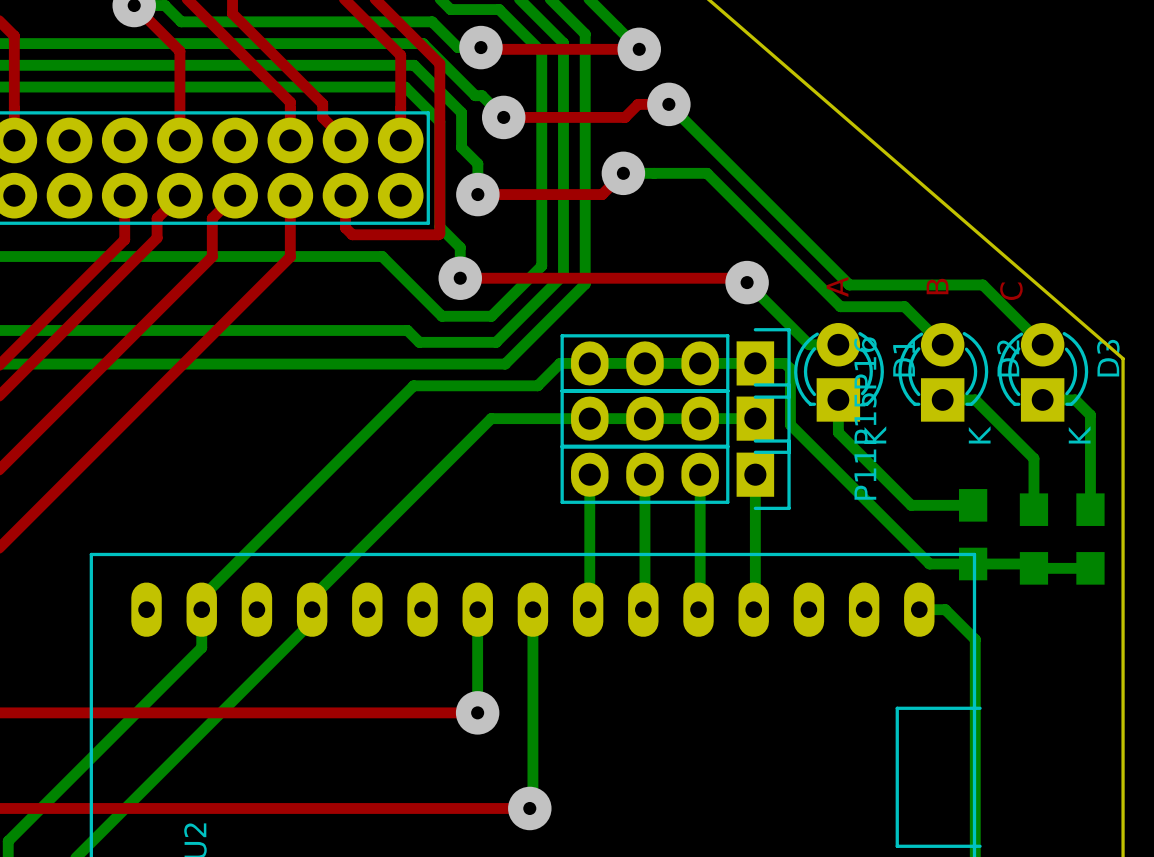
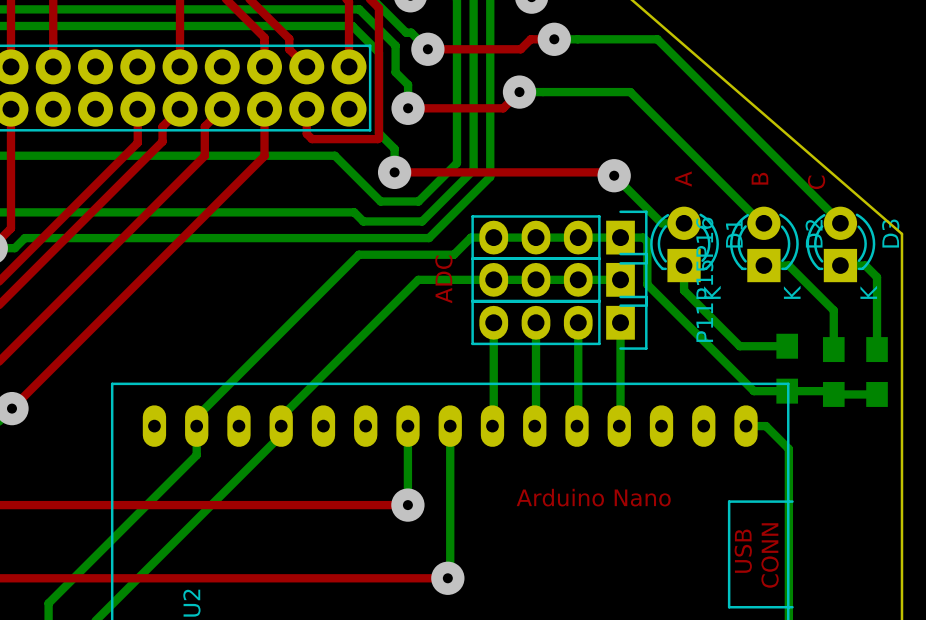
bottom track: (668, 104) (849, 284) (982, 284) (1042, 344) -> (554, 39) (657, 39) (840, 223)
bottom track: (707, 173) (840, 306) (904, 306) (942, 344) -> (583, 92) (630, 92) (761, 223) (763, 223)
text: none -> ADC (443, 279)
text: none -> Arduino Nano (593, 497)
text: none -> USB (743, 551)
text: none -> CONN (770, 555)

